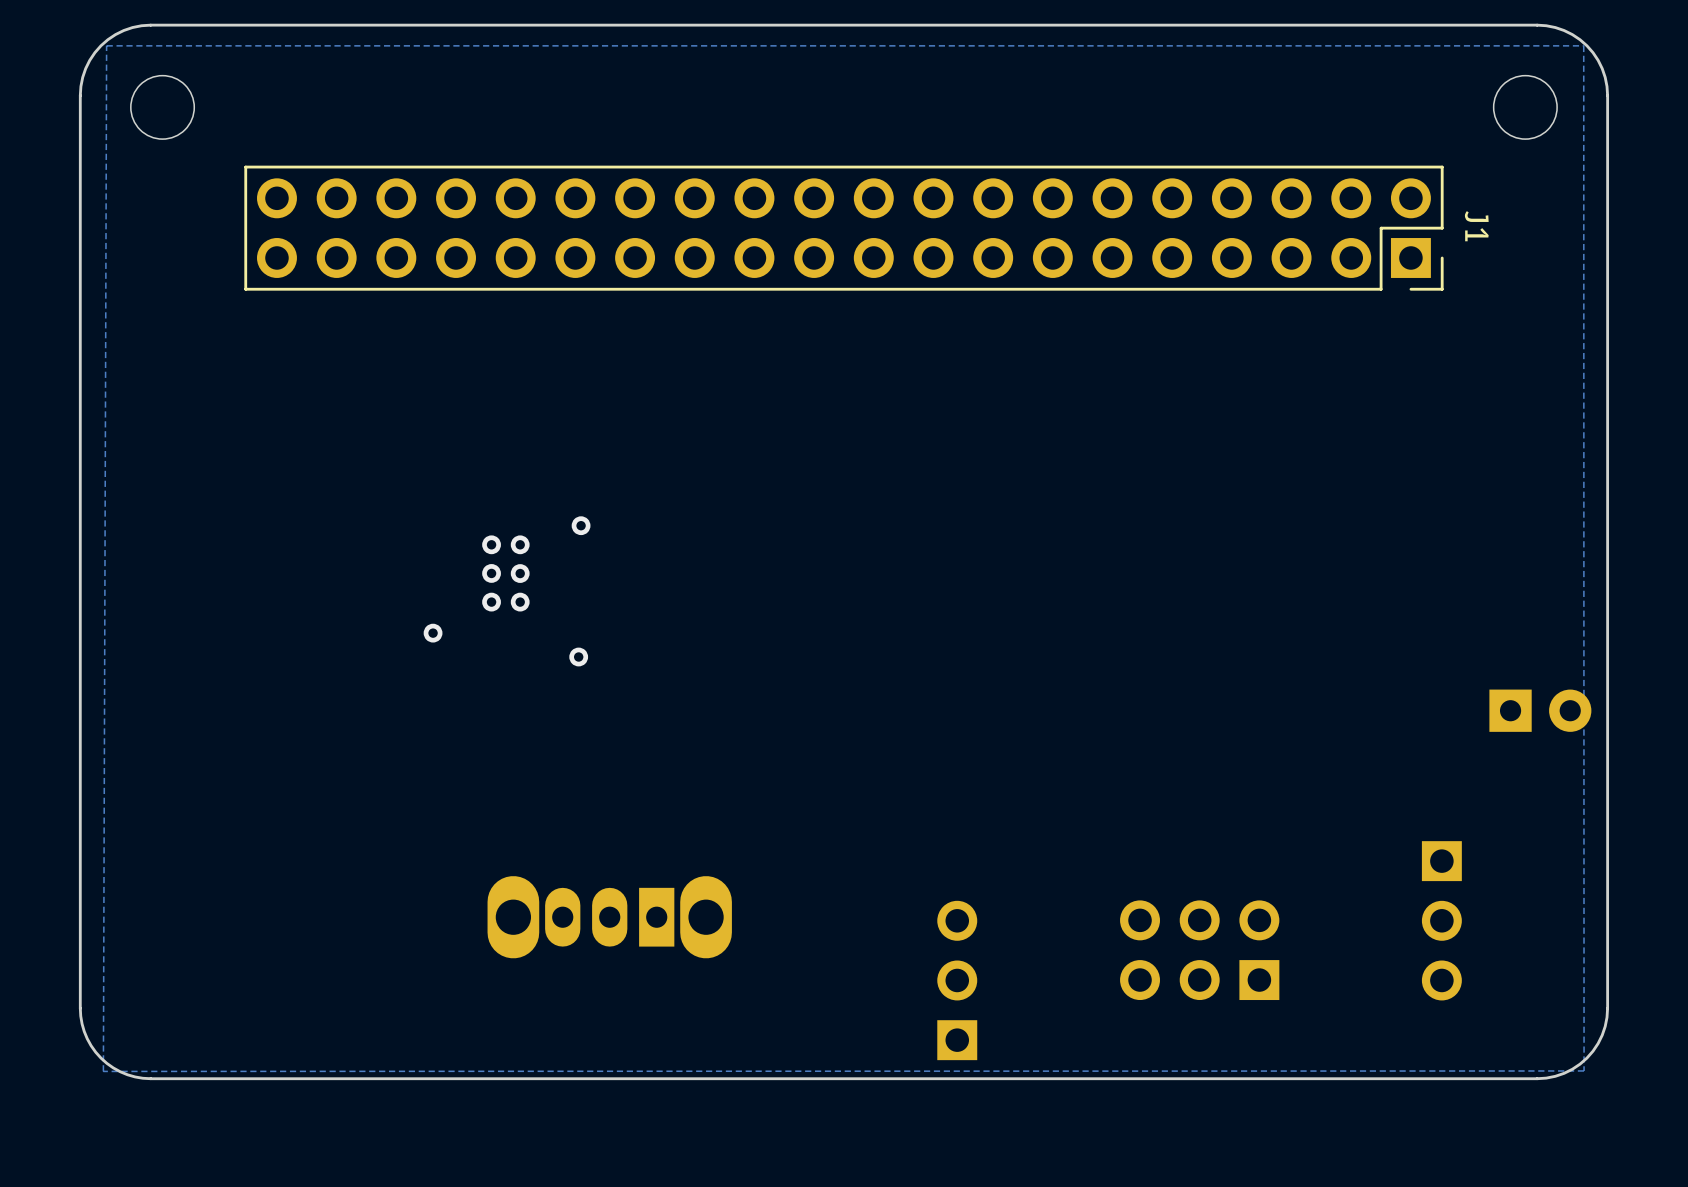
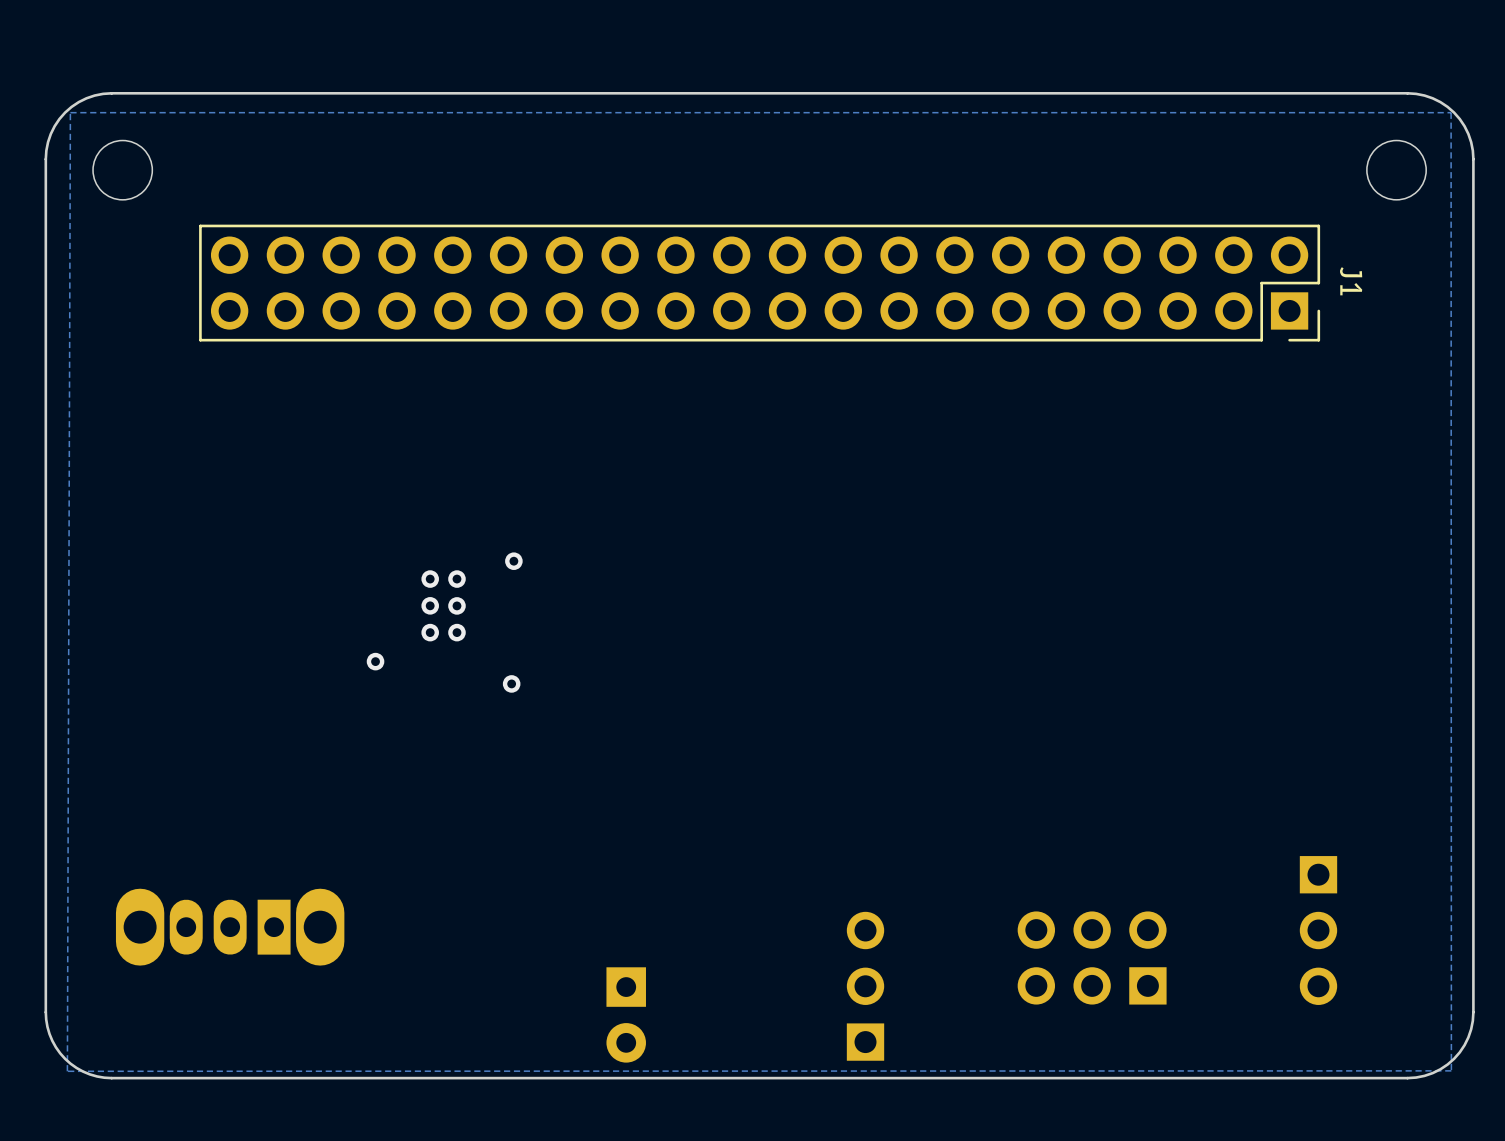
part: (1540, 710) -> none
part position: (609, 917) -> (230, 927)
part: none -> (626, 1014)

